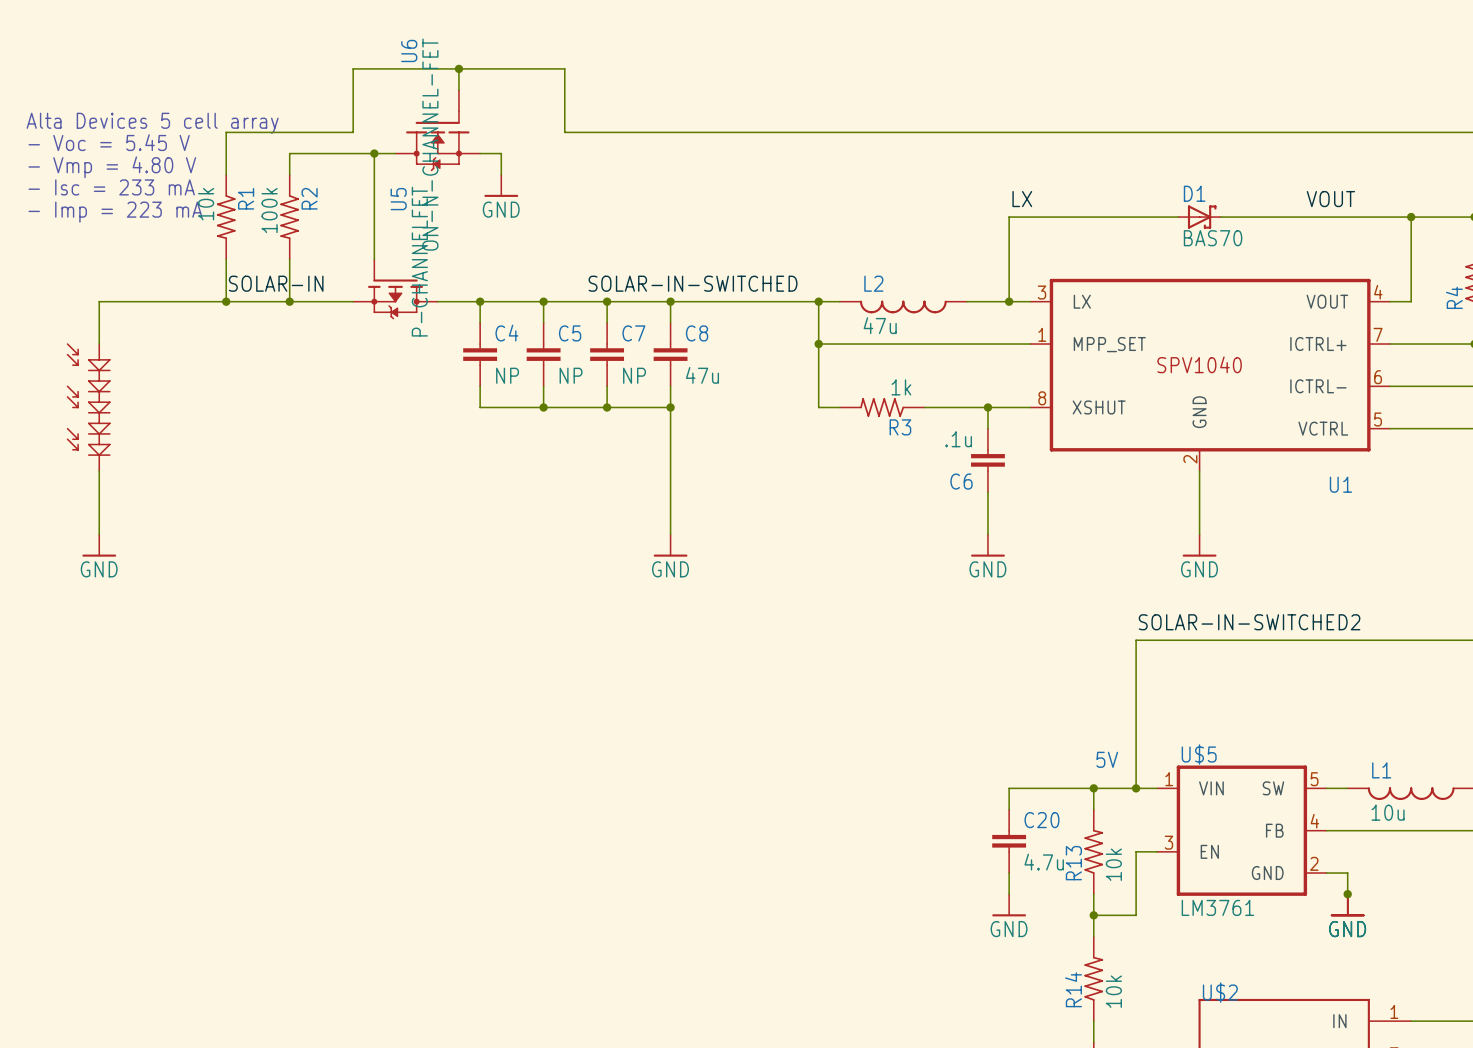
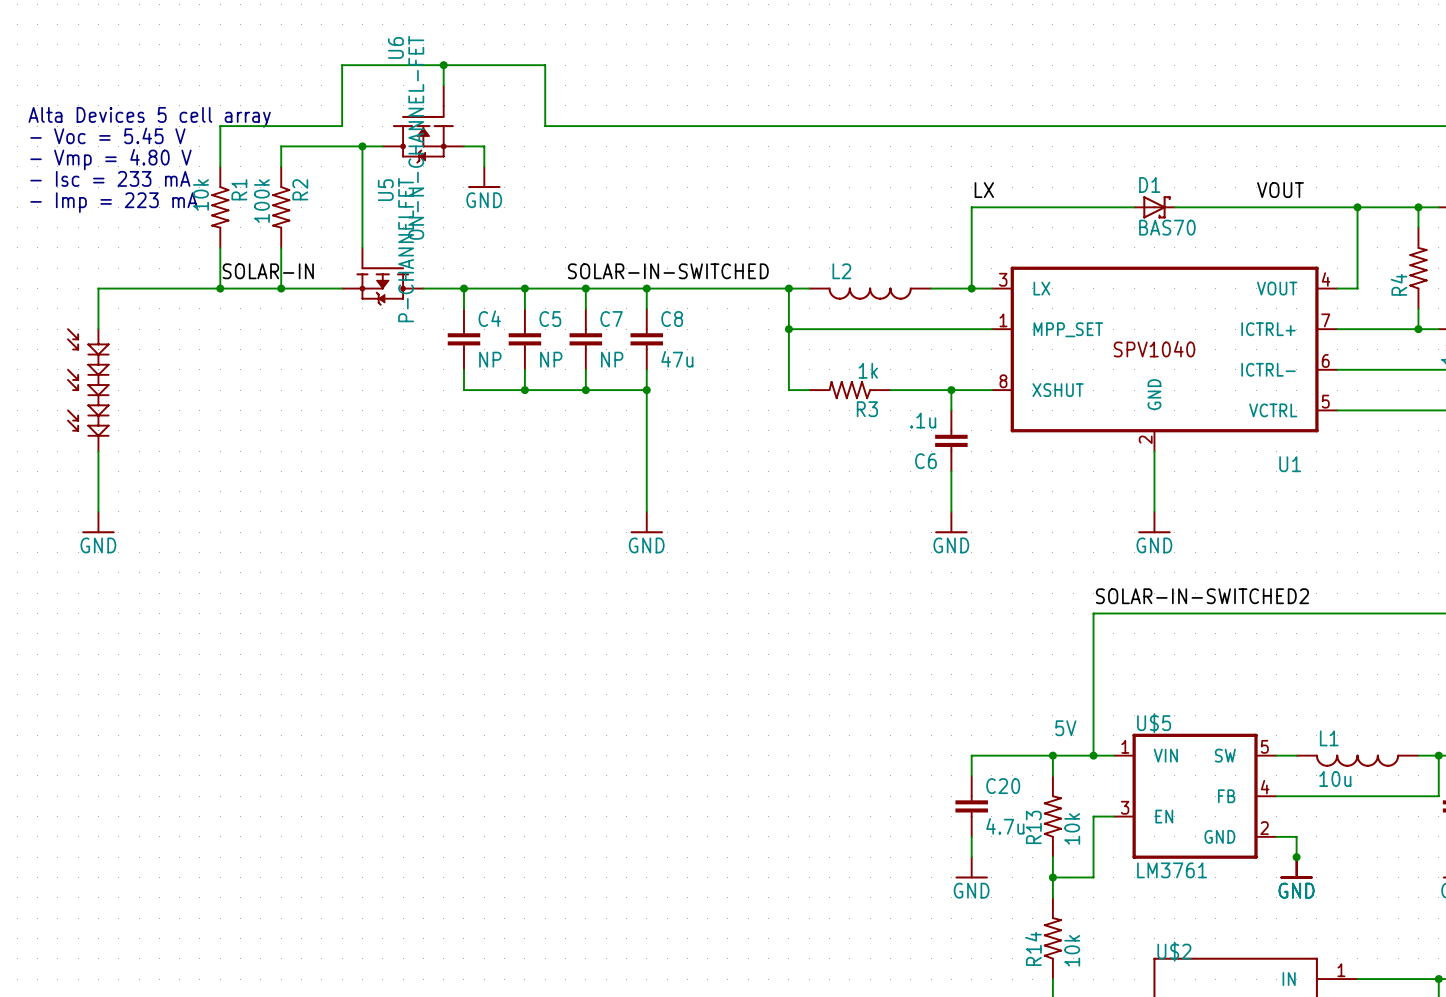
L2 value: 47u (880, 325) -> none

